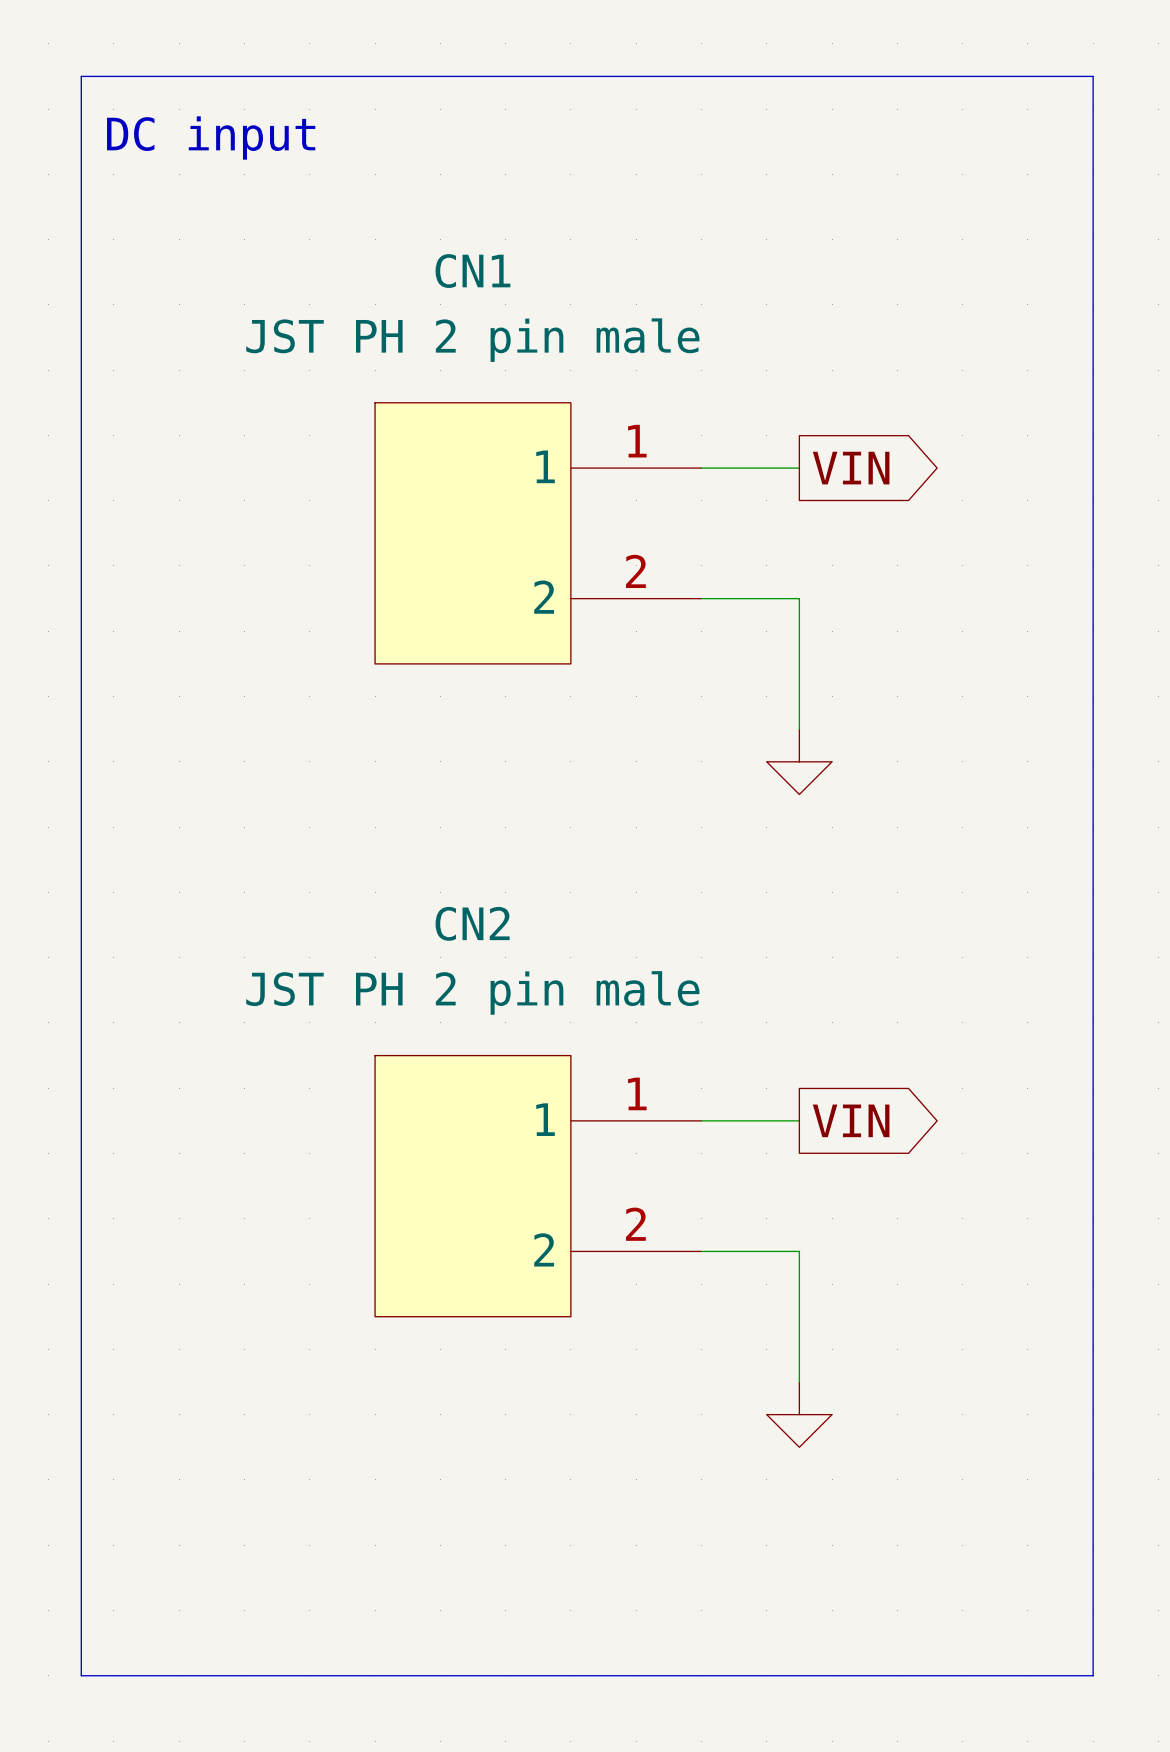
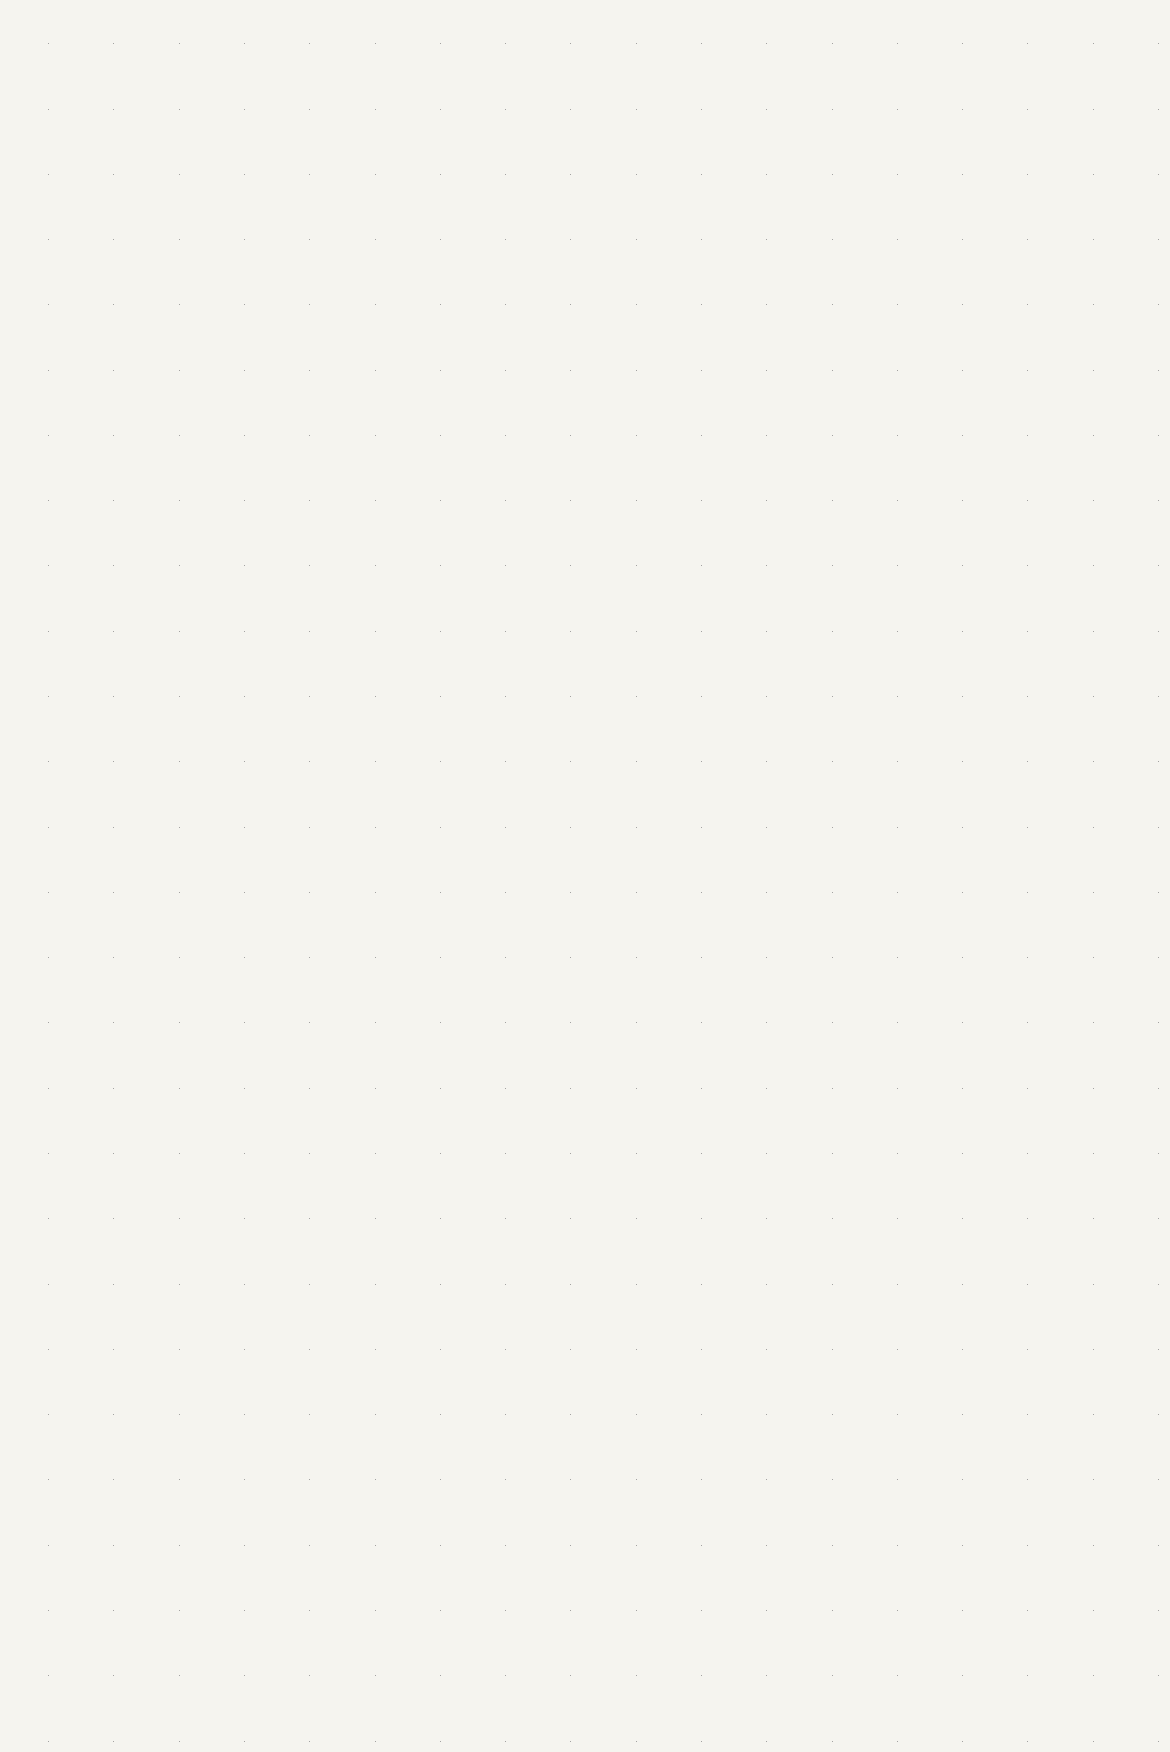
line: (81, 76) (1093, 76) (1093, 1675) (81, 1675) (81, 76) -> none
text: DC input (211, 138) -> none
wire: (701, 468) (799, 468) -> none
global label: VIN (851, 468) -> none
CN1: JST PH 2 pin male (538, 533) -> none
wire: (701, 598) (799, 598) (799, 729) -> none
power symbol: (799, 761) -> none
wire: (701, 1120) (799, 1120) -> none
global label: VIN (851, 1120) -> none
CN2: JST PH 2 pin male (538, 1186) -> none
wire: (701, 1251) (799, 1251) (799, 1381) -> none
power symbol: (799, 1414) -> none

